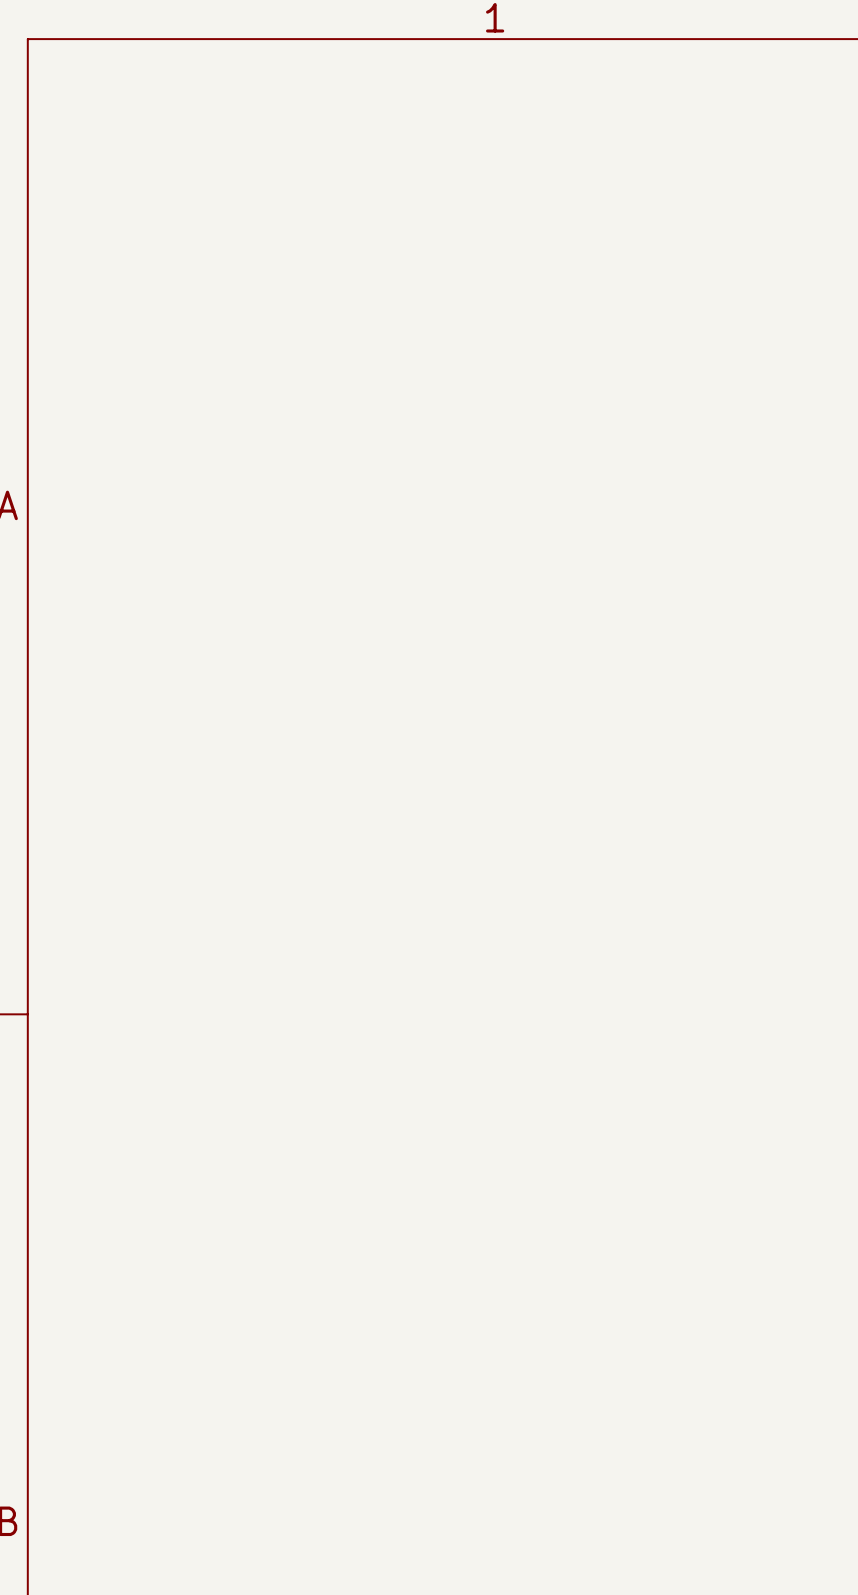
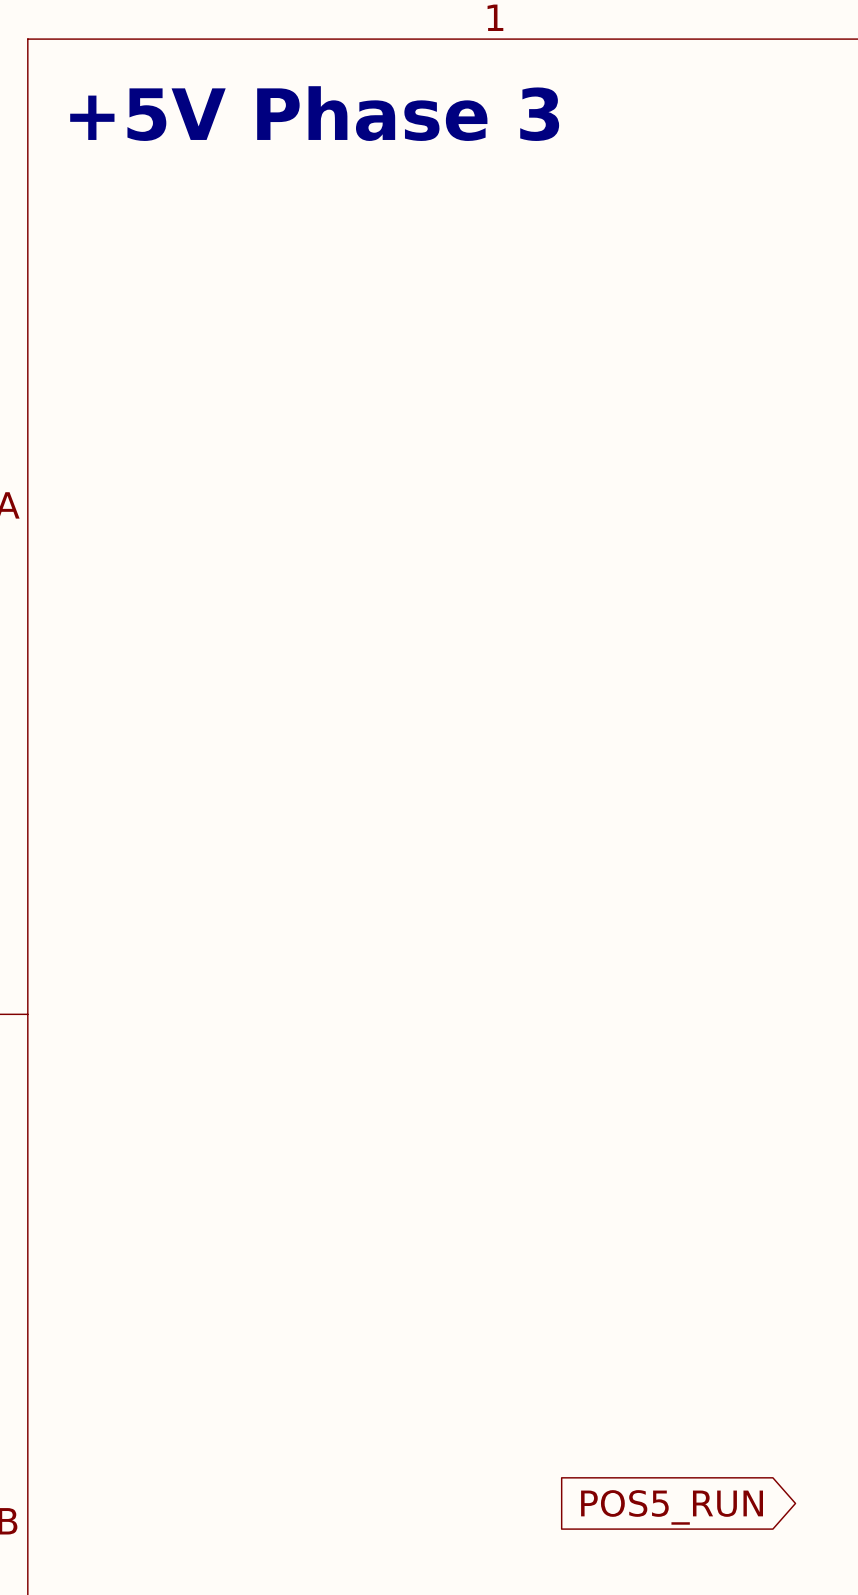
text: none -> +5V Phase 3 (314, 113)
global label: none -> POS5_RUN (672, 1507)

